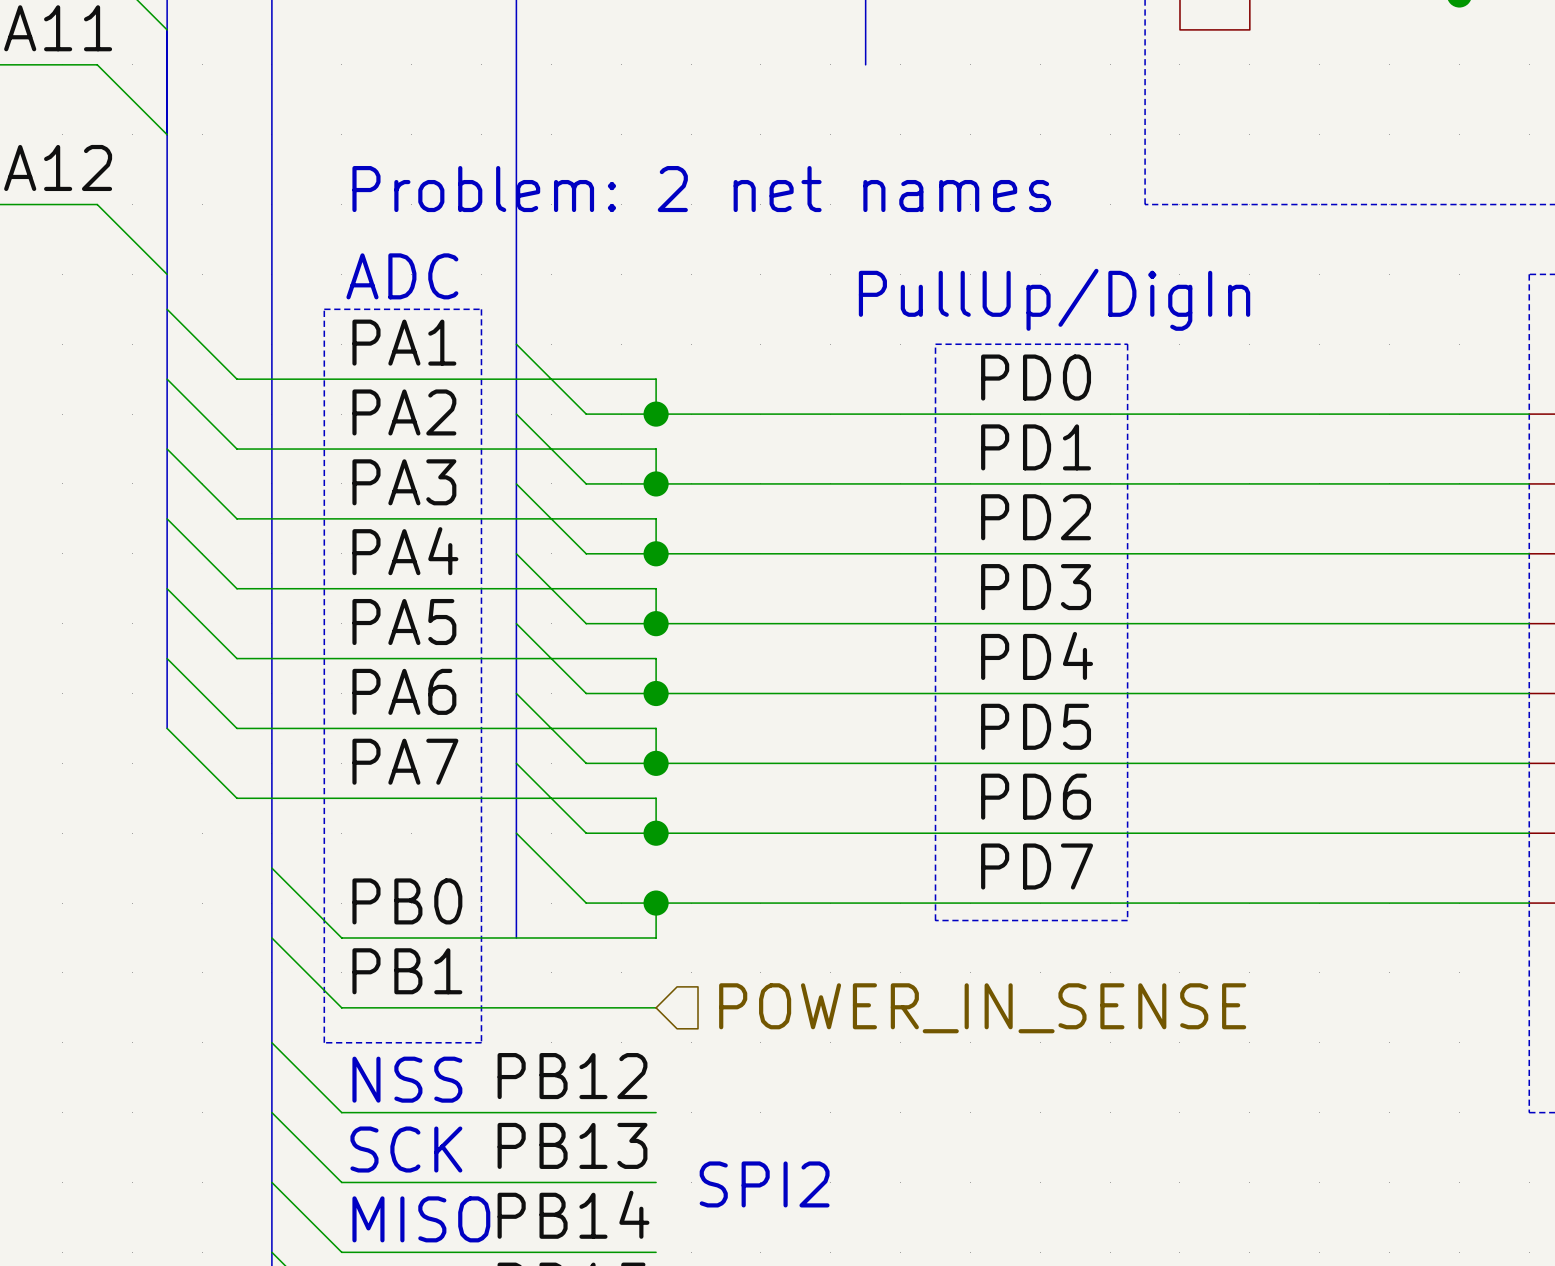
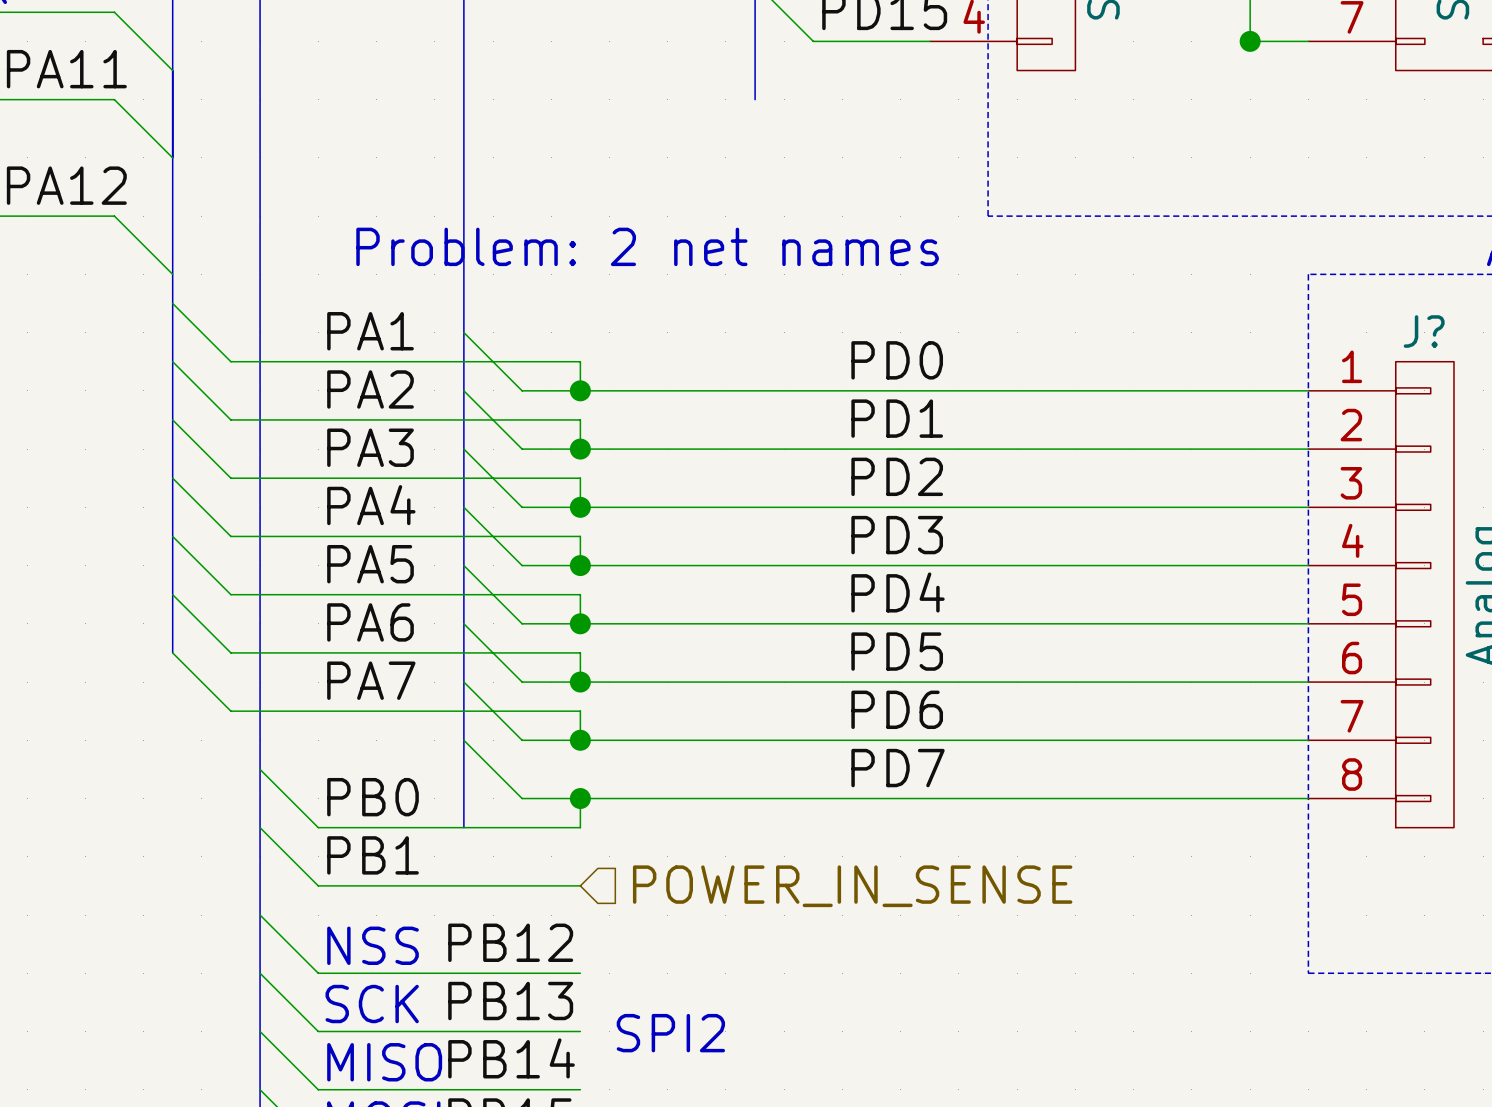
text position: Problem: 2 net names (701, 189) -> Problem: 2 net names (647, 246)
text: ADC (402, 276) -> none
text: PullUp/DigIn (1054, 299) -> none
line: (324, 309) (481, 309) (481, 1042) (324, 1042) (324, 309) -> none
line: (935, 344) (1127, 344) (1127, 920) (935, 920) (935, 344) -> none

